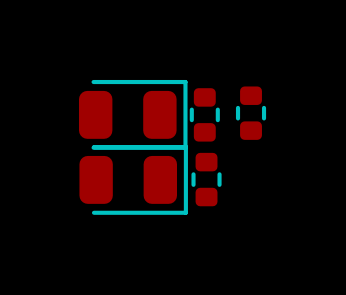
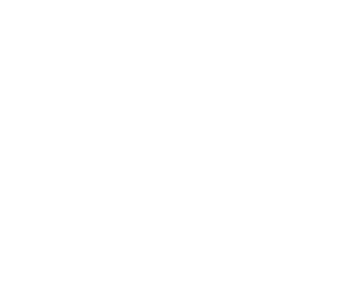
part: (251, 113) -> none
part: (133, 114) -> none
part: (204, 114) -> none
part: (133, 179) -> none
part: (206, 179) -> none

